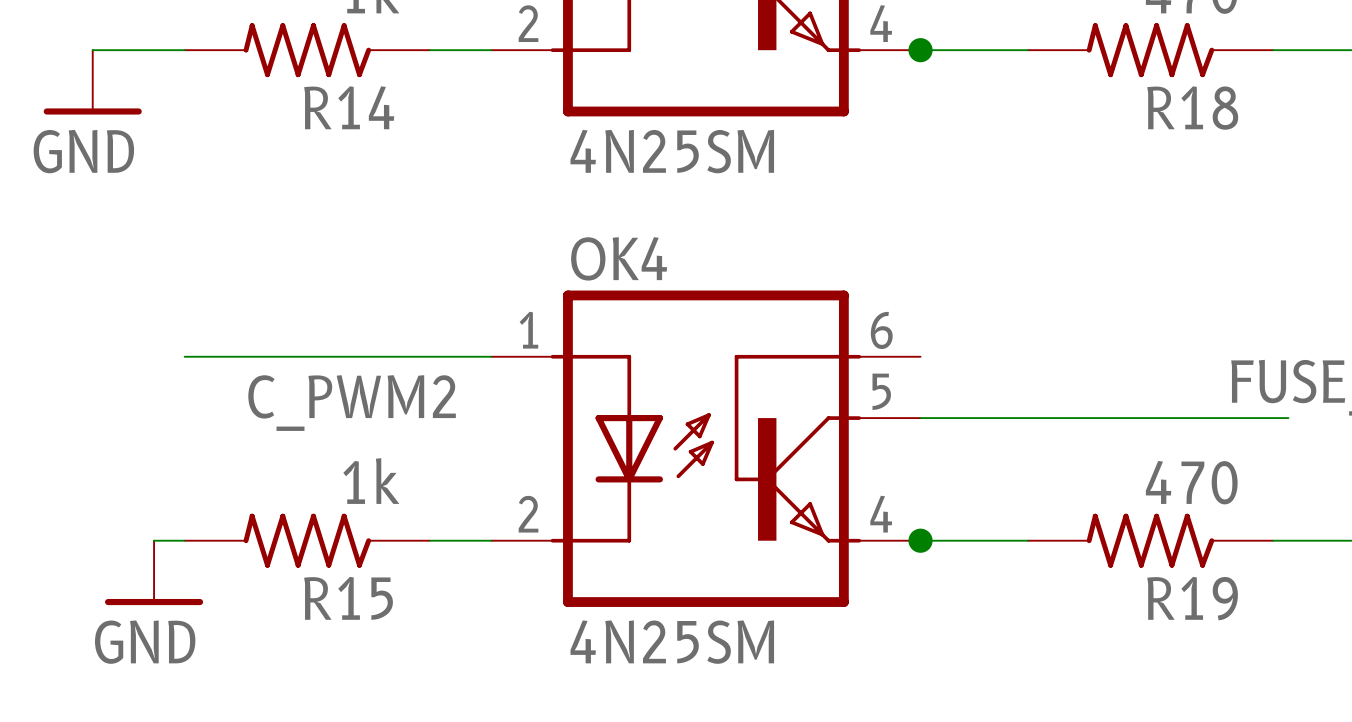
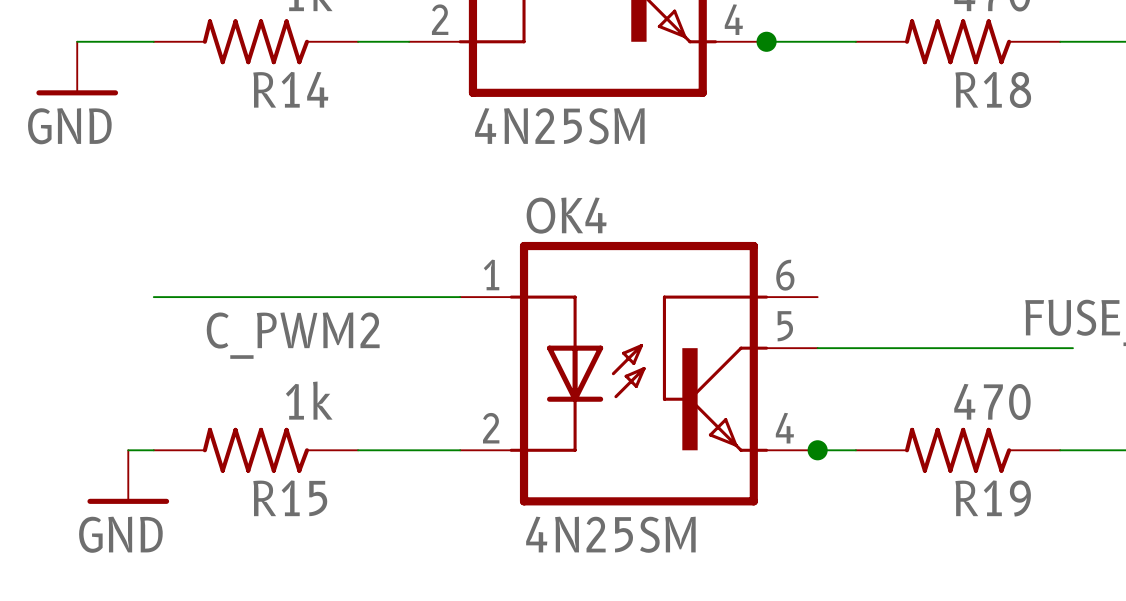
OK4 position: (705, 448) -> (638, 373)
junction position: (920, 540) -> (817, 450)

